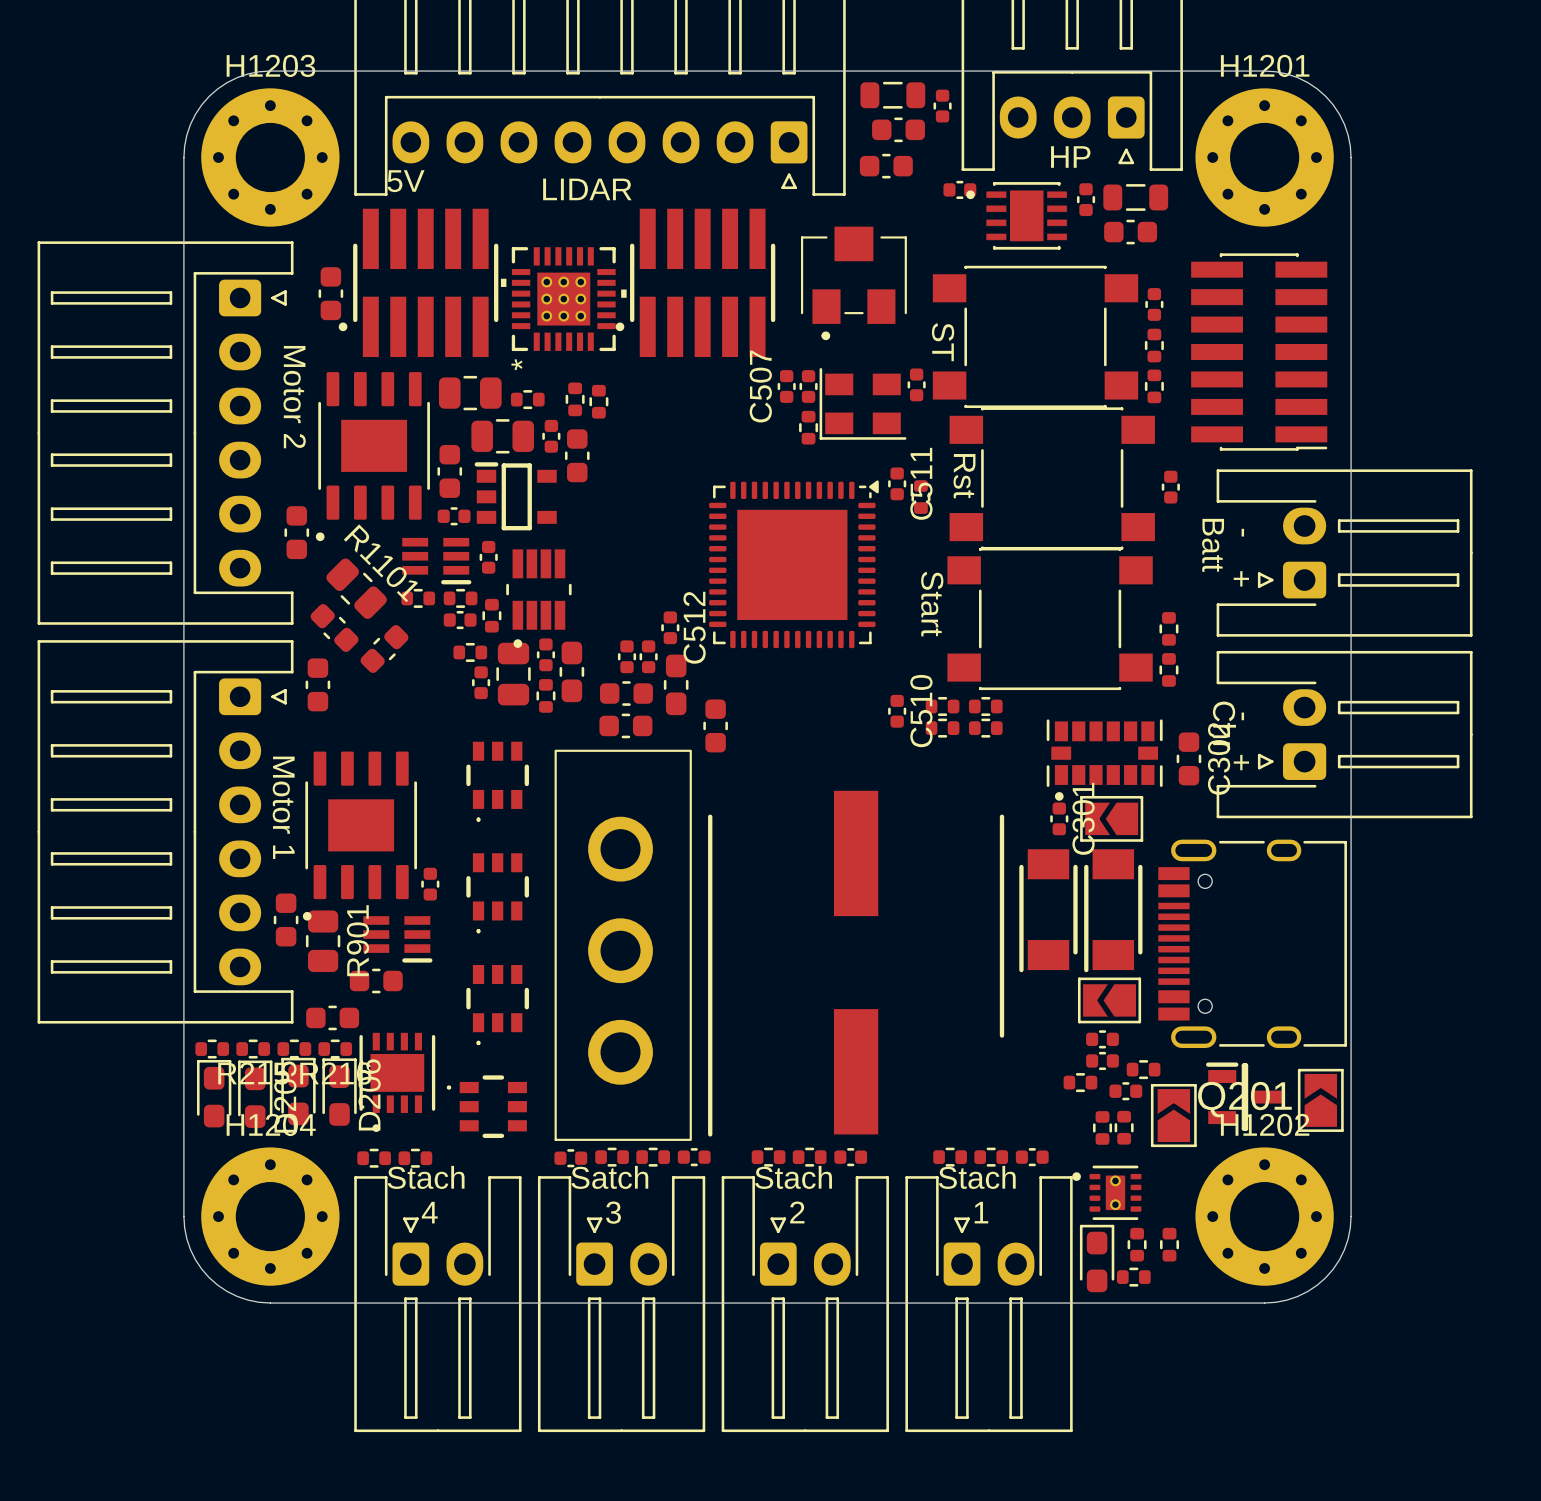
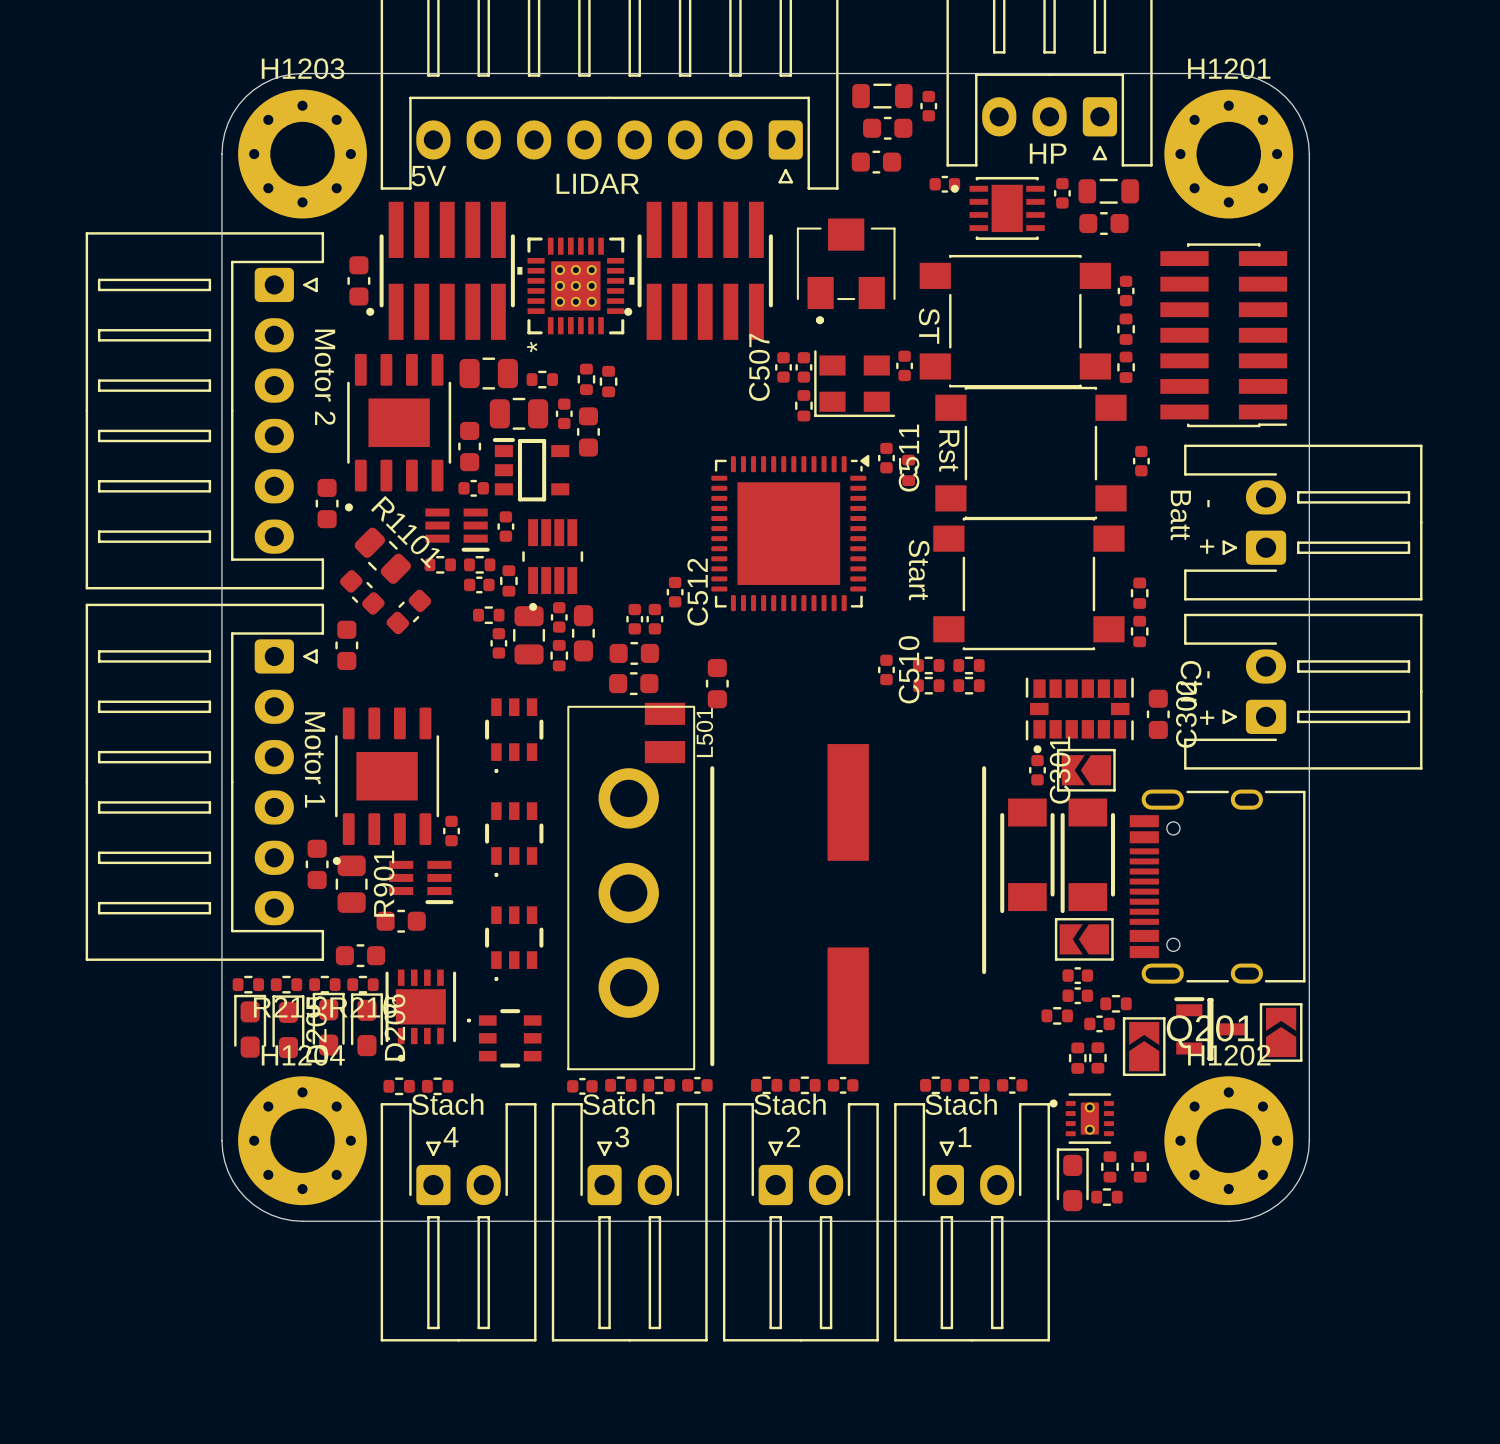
part: (676, 684) -> none
L501: none -> (664, 732)

